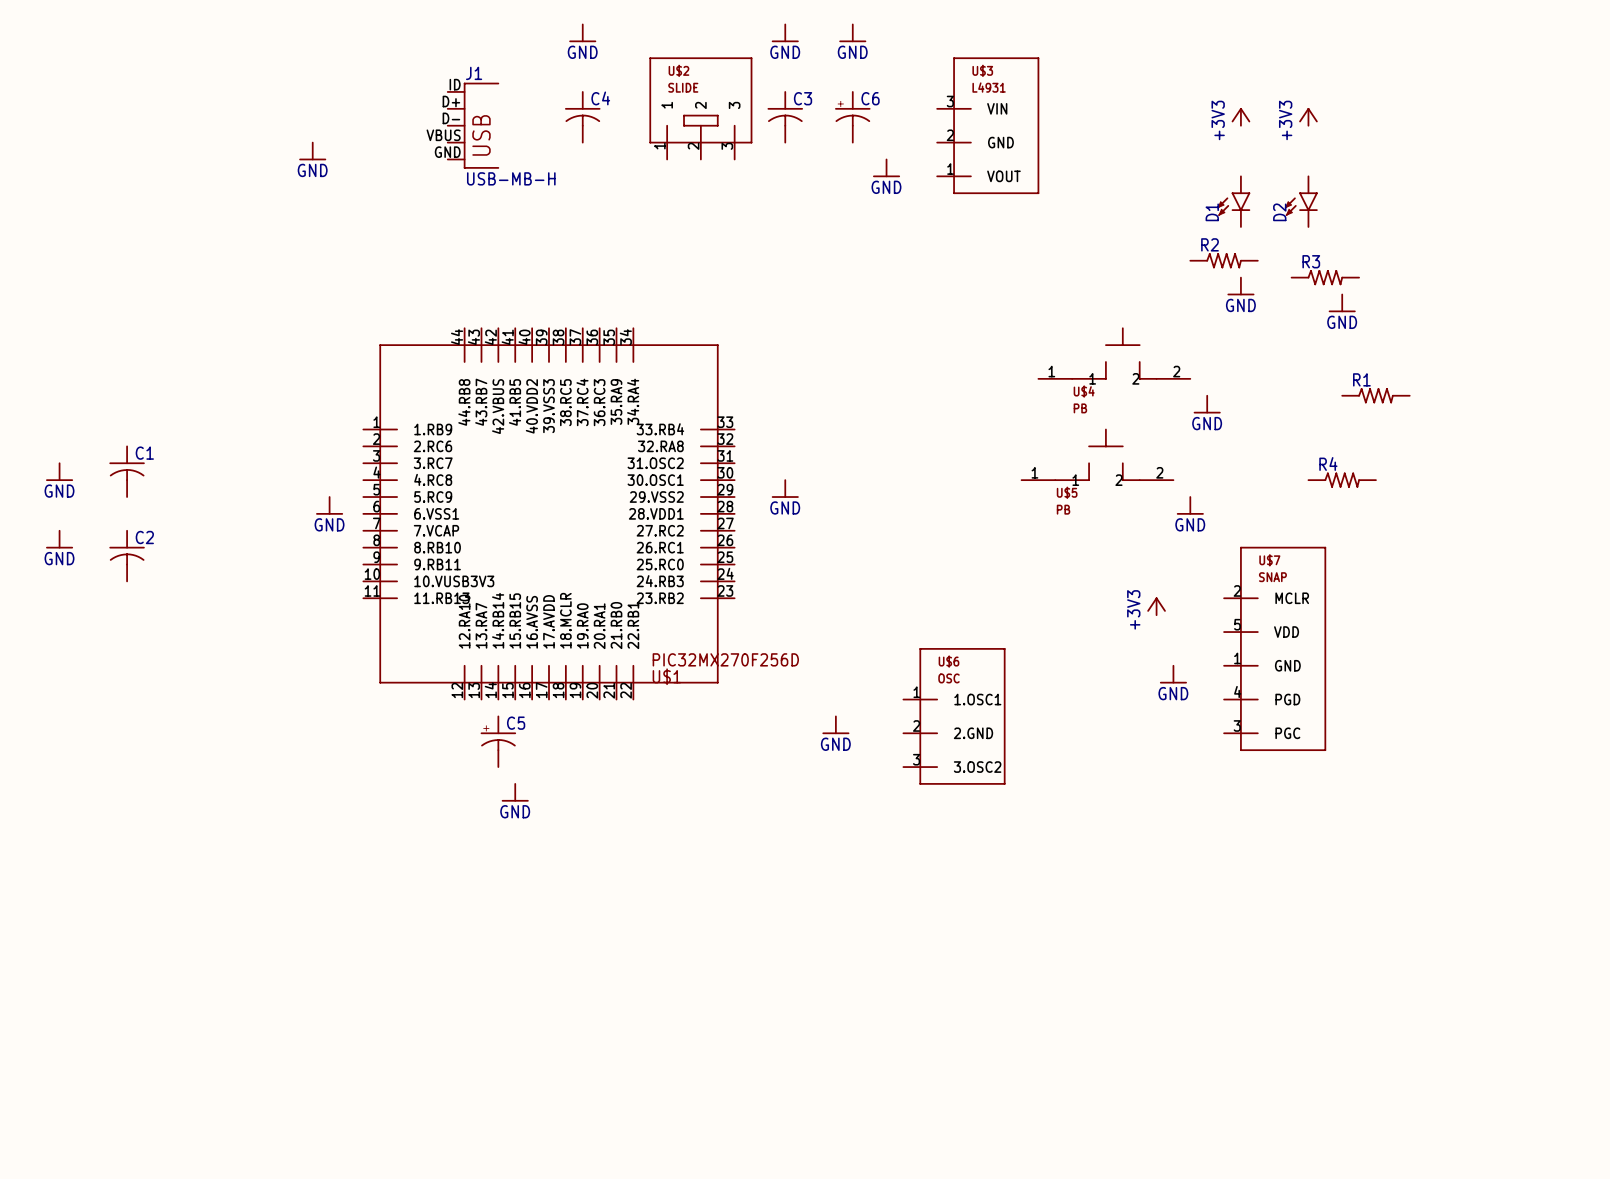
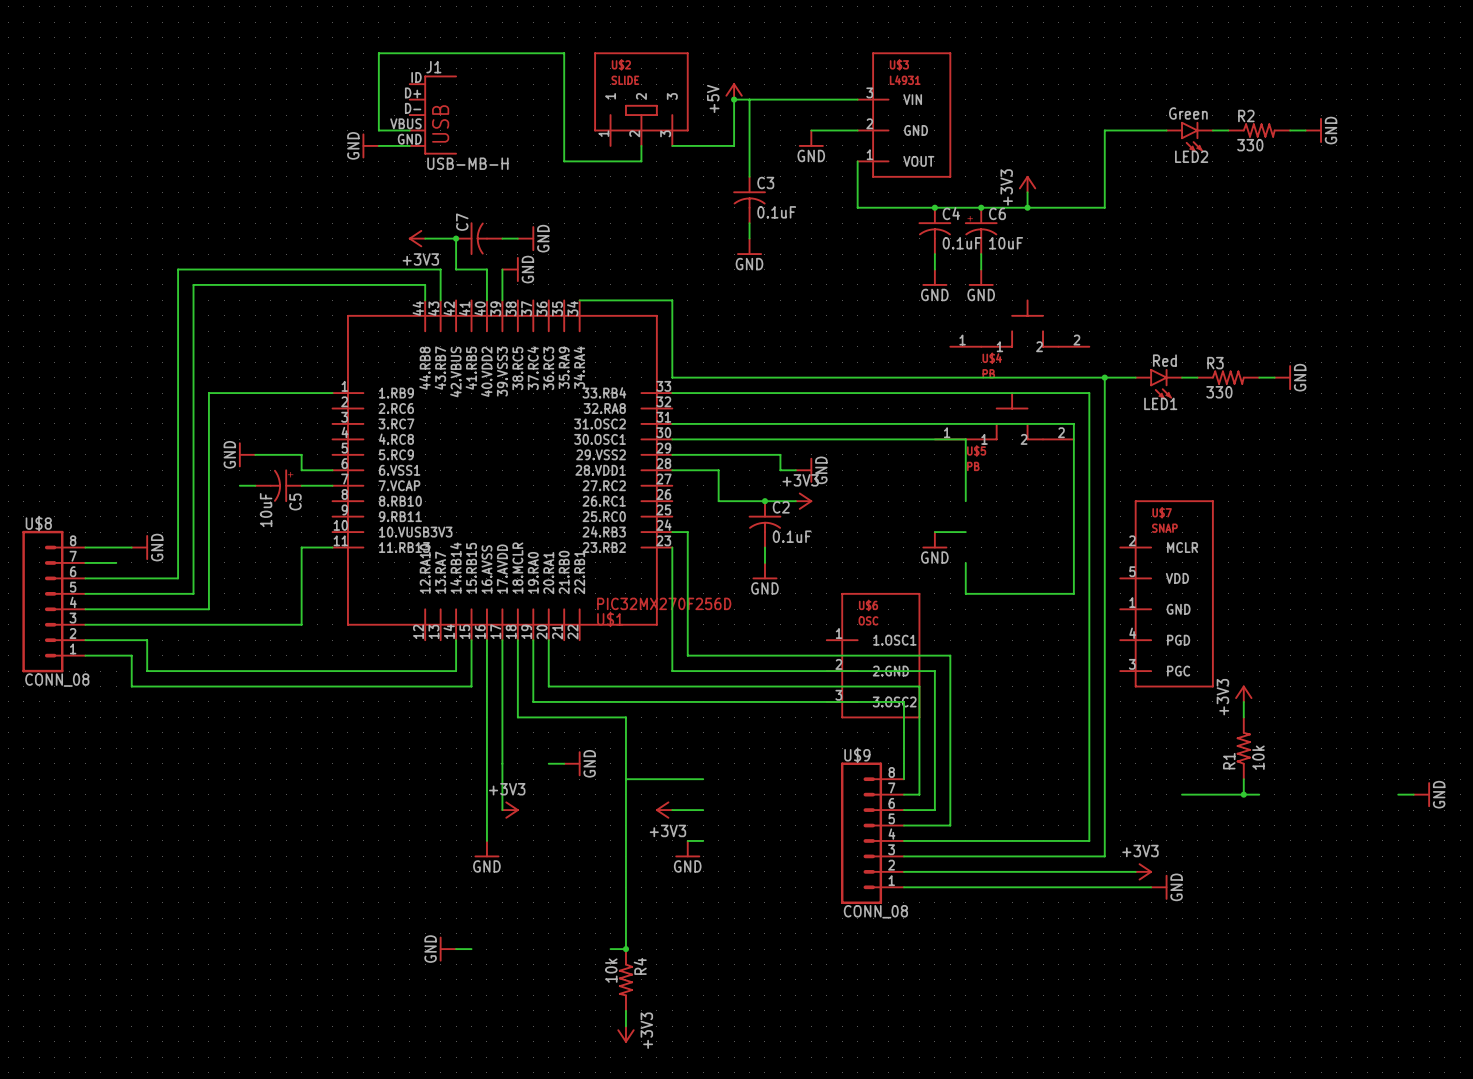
power symbol: GND (582, 33) -> none
power symbol: GND (785, 33) -> none
power symbol: GND (852, 33) -> none
power symbol: none -> +5V (734, 91)
junction: none -> (734, 99)
wire: none -> (749, 99) (749, 176)
wire: none -> (857, 99) (734, 99) (734, 145) (672, 145)
power symbol: +3V3 (1240, 116) -> none
power symbol: +3V3 (1308, 116) -> none
C4 position: (582, 117) -> (934, 230)
C3 position: (785, 117) -> (749, 200)
C6 position: (852, 117) -> (981, 230)
wire: none -> (409, 130) (378, 130) (378, 53) (564, 53) (564, 161) (641, 161) (641, 145)
wire: none -> (811, 130) (857, 130)
wire: none -> (1166, 130) (1104, 130) (1104, 207) (857, 207) (857, 161)
wire: none -> (1212, 130) (1228, 130)
wire: none -> (1290, 130) (1305, 130)
power symbol: none -> GND (1313, 130)
LED2: none -> Green (1189, 136)
power symbol position: GND (312, 151) -> GND (370, 145)
R2 value: none -> 330 (1250, 145)
power symbol rotation: 0° (312, 159) -> 90° clockwise (363, 145)
wire: none -> (378, 145) (409, 145)
power symbol position: GND (886, 168) -> GND (811, 138)
power symbol: none -> +3V3 (1027, 184)
D1: (1233, 201) -> none
D2: (1301, 201) -> none
wire: none -> (1027, 192) (1027, 207)
junction: none -> (934, 207)
junction: none -> (981, 207)
junction: none -> (1027, 207)
C3 value: none -> 0.1uF (776, 212)
wire: none -> (749, 223) (749, 238)
power symbol: none -> +3V3 (417, 238)
wire: none -> (425, 238) (456, 238) (456, 269) (486, 269) (486, 300)
junction: none -> (456, 238)
C7: none -> (479, 238)
wire: none -> (502, 238) (517, 238)
power symbol: none -> GND (525, 238)
R2 position: (1224, 260) -> (1259, 130)
C4 value: none -> 0.1uF (962, 243)
C6 value: none -> 10uF (1006, 243)
power symbol: none -> GND (749, 246)
wire: none -> (934, 254) (934, 269)
wire: none -> (981, 254) (981, 269)
R3 position: (1325, 277) -> (1228, 377)
power symbol: GND (1240, 286) -> none
wire: none -> (502, 269) (502, 300)
power symbol: none -> GND (510, 269)
power symbol: none -> GND (934, 277)
power symbol: none -> GND (981, 277)
power symbol: GND (1342, 303) -> none
wire: none -> (425, 300) (425, 284) (193, 284) (193, 593) (85, 593)
wire: none -> (440, 300) (440, 269) (178, 269) (178, 578) (85, 578)
wire: none -> (579, 300) (672, 300) (672, 377) (1135, 377)
R1 rotation: 0° (1375, 395) -> 90° counterclockwise (1243, 748)
R1 position: (1375, 395) -> (1243, 748)
power symbol: GND (1207, 404) -> none
wire: none -> (1104, 377) (1104, 856) (903, 856)
junction: none -> (1104, 377)
wire: none -> (1182, 377) (1197, 377)
wire: none -> (1259, 377) (1274, 377)
power symbol: none -> GND (1282, 377)
LED1: none -> Red (1158, 384)
R3 value: none -> 330 (1219, 392)
wire: none -> (332, 393) (208, 393) (208, 609) (85, 609)
wire: none -> (672, 393) (1089, 393) (1089, 840) (903, 840)
wire: none -> (672, 423) (1073, 423) (1073, 593) (965, 593) (965, 562)
C1: (127, 471) -> none
power symbol: GND (59, 472) -> none
wire: none -> (672, 439) (965, 439) (965, 501)
R4 rotation: 0° (1342, 480) -> 90° clockwise (625, 979)
R4 position: (1342, 480) -> (625, 979)
power symbol: GND (785, 488) -> none
wire: none -> (255, 454) (301, 454) (301, 470) (332, 470)
wire: none -> (672, 454) (780, 454) (780, 470) (795, 470)
power symbol position: GND (329, 505) -> GND (247, 454)
power symbol: GND (1190, 505) -> none
power symbol rotation: 0° (329, 513) -> 90° clockwise (239, 454)
wire: none -> (672, 470) (718, 470) (718, 501) (795, 501)
power symbol: none -> GND (803, 470)
wire: none -> (239, 485) (255, 485)
wire: none -> (301, 485) (332, 485)
power symbol: GND (59, 539) -> none
junction: none -> (764, 501)
power symbol: none -> +3V3 (803, 501)
C2 position: (127, 556) -> (764, 524)
C5 value: none -> 10uF (266, 510)
wire: none -> (672, 532) (687, 532) (687, 655) (950, 655) (950, 825) (903, 825)
wire: none -> (934, 532) (965, 532)
C2 value: none -> 0.1uF (792, 536)
power symbol: none -> GND (934, 540)
wire: none -> (85, 547) (131, 547)
power symbol: none -> GND (139, 547)
wire: none -> (332, 547) (301, 547) (301, 624) (85, 624)
wire: none -> (672, 547) (672, 671) (934, 671) (934, 810) (903, 810)
wire: none -> (764, 547) (764, 562)
power symbol: +3V3 (1156, 606) -> none
wire: none -> (85, 562) (116, 562)
power symbol: none -> GND (764, 571)
U$8: none -> CONN_08 (53, 601)
power symbol: GND (1173, 674) -> none
wire: none -> (85, 640) (147, 640) (147, 671) (456, 671) (456, 640)
wire: none -> (471, 640) (471, 686) (131, 686) (131, 655) (85, 655)
wire: none -> (486, 640) (486, 840)
wire: none -> (502, 640) (502, 810)
wire: none -> (517, 640) (517, 717) (625, 717) (625, 949) (610, 949)
wire: none -> (533, 640) (533, 701) (903, 701) (903, 779)
wire: none -> (548, 640) (548, 686) (919, 686) (919, 794) (903, 794)
power symbol: GND (835, 725) -> none
C5 rotation: 0° (498, 738) -> 90° clockwise (281, 485)
C5 position: (498, 741) -> (278, 485)
power symbol: none -> +3V3 (1243, 693)
wire: none -> (1243, 701) (1243, 717)
power symbol: GND (515, 792) -> none
R1 value: none -> 10k (1258, 757)
wire: none -> (548, 763) (564, 763)
power symbol: none -> GND (572, 763)
wire: none -> (625, 779) (703, 779)
wire: none -> (1243, 779) (1243, 794)
wire: none -> (1182, 794) (1259, 794)
junction: none -> (1243, 794)
wire: none -> (1398, 794) (1413, 794)
power symbol: none -> GND (1421, 794)
power symbol: none -> +3V3 (510, 810)
power symbol: none -> +3V3 (664, 810)
wire: none -> (672, 810) (703, 810)
U$9: none -> CONN_08 (872, 833)
wire: none -> (687, 840) (703, 840)
power symbol: none -> GND (486, 849)
power symbol: none -> GND (687, 849)
wire: none -> (903, 871) (1135, 871)
power symbol: none -> +3V3 (1143, 871)
wire: none -> (903, 887) (1151, 887)
power symbol: none -> GND (1159, 887)
power symbol: none -> GND (447, 949)
wire: none -> (456, 949) (471, 949)
junction: none -> (625, 949)
R4 value: none -> 10k (611, 970)
wire: none -> (625, 1010) (625, 1026)
power symbol: none -> +3V3 (625, 1034)

